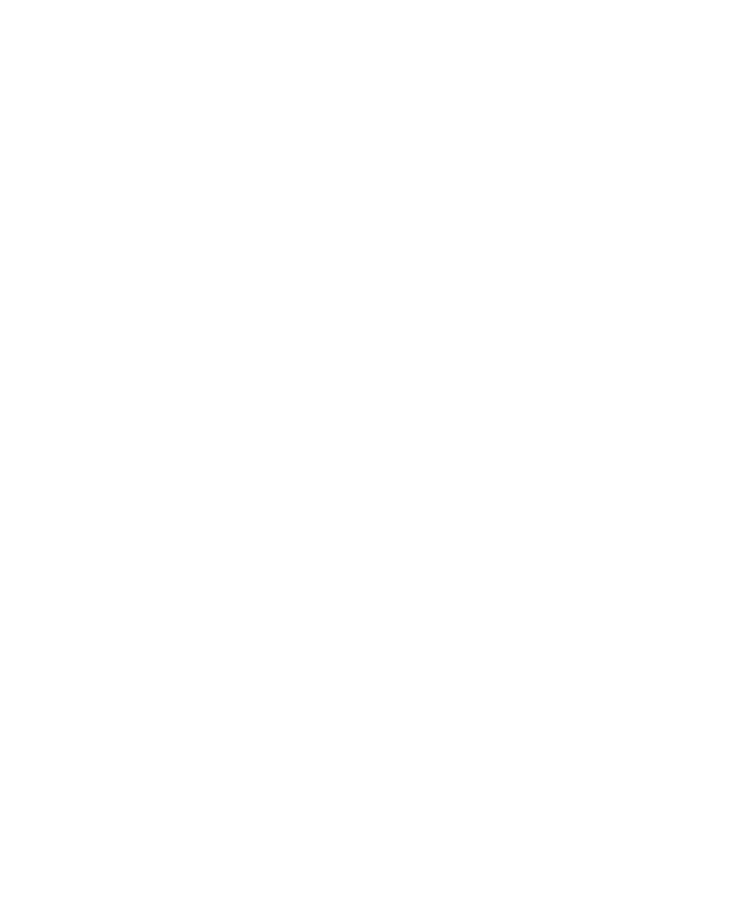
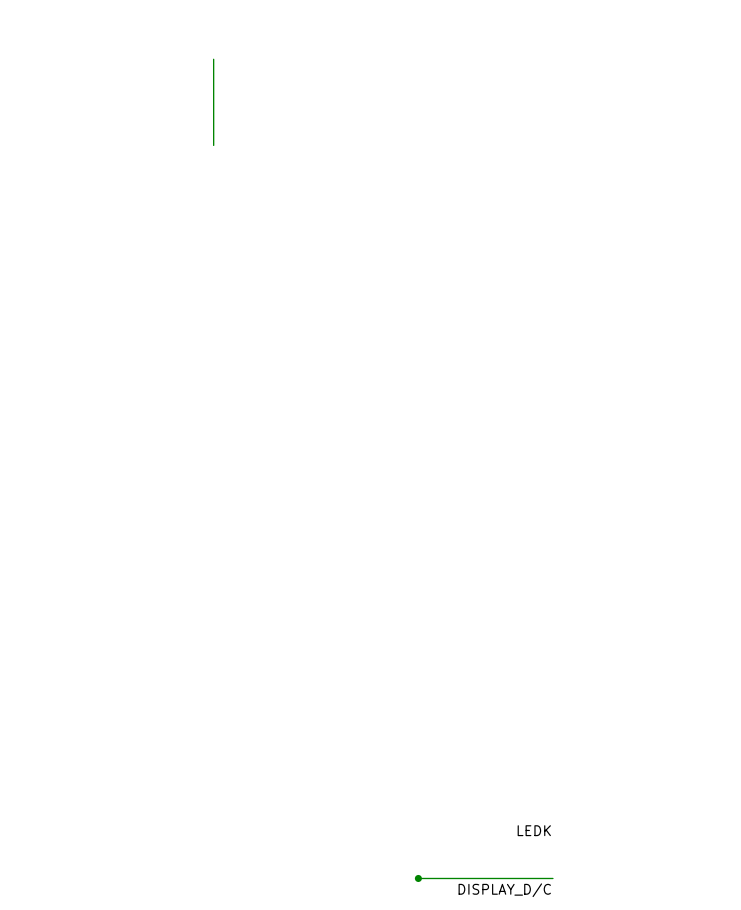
wire: none -> (213, 59) (213, 145)
label: none -> LEDK (534, 830)
wire: none -> (418, 878) (552, 878)
junction: none -> (418, 878)
label: none -> DISPLAY_D/C (504, 890)

